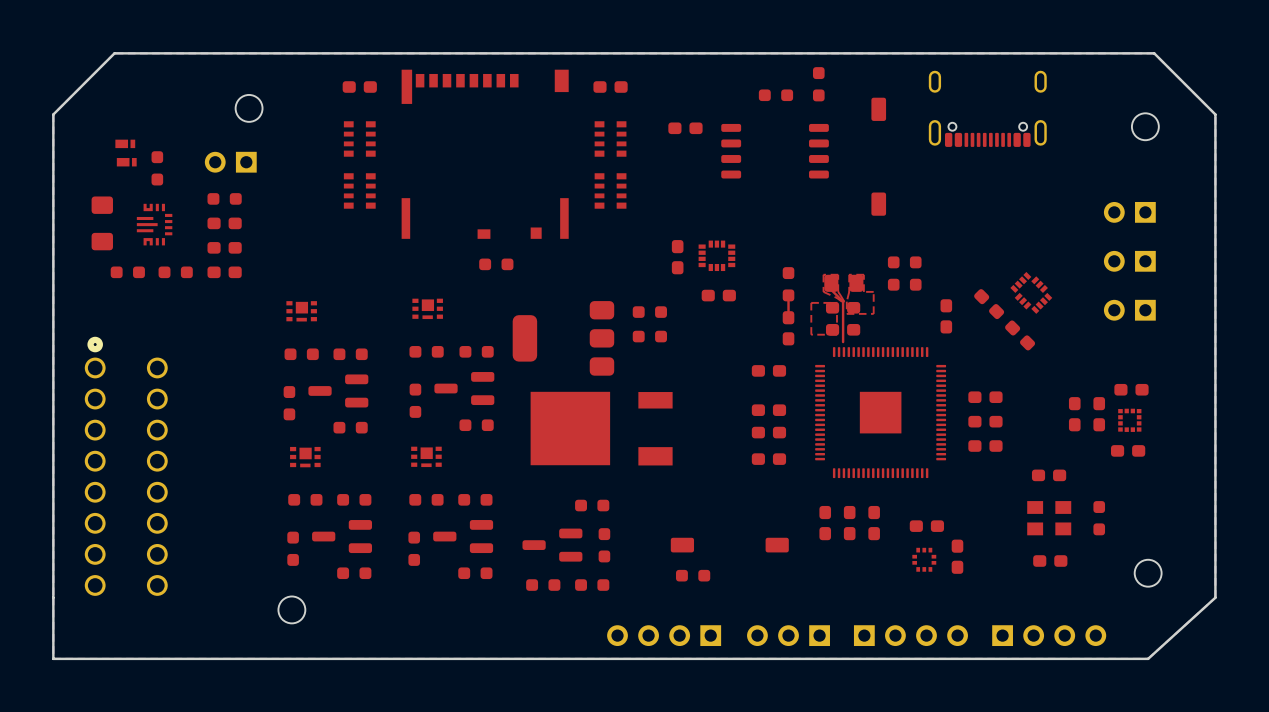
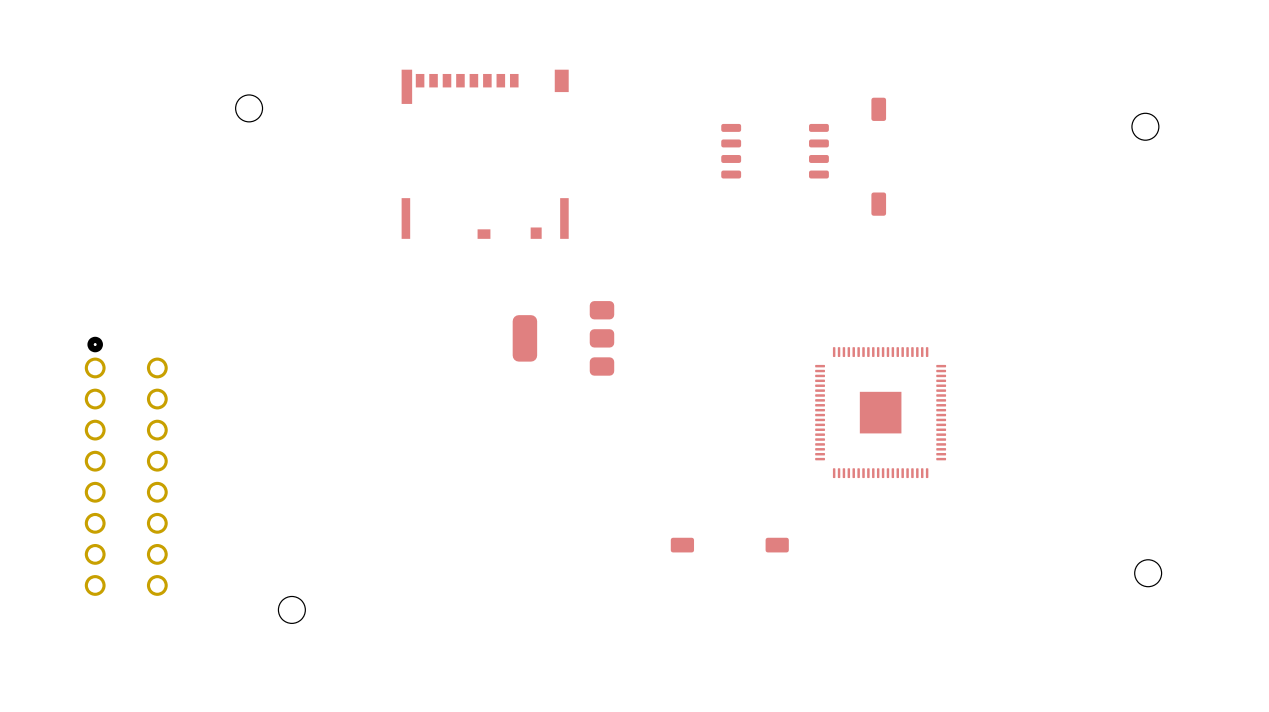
board edge: (1154, 53) (114, 53) (53, 114) (53, 658) (1148, 658) (1215, 597) (1215, 114) (1154, 53) -> none
part: (818, 84) -> none
part: (359, 87) -> none
part: (610, 87) -> none
part: (775, 95) -> none
part: (987, 108) -> none
part: (685, 128) -> none
part: (359, 138) -> none
part: (610, 138) -> none
part: (125, 143) -> none
part: (126, 162) -> none
part: (230, 162) -> none
part: (157, 168) -> none
part: (359, 190) -> none
part: (610, 190) -> none
part: (224, 198) -> none
part: (1129, 212) -> none
part: (102, 223) -> none
part: (224, 223) -> none
part: (154, 224) -> none
part: (224, 247) -> none
part: (716, 255) -> none
part: (677, 257) -> none
part: (1129, 261) -> none
part: (496, 264) -> none
part: (127, 272) -> none
part: (175, 272) -> none
part: (224, 272) -> none
part: (893, 273) -> none
part: (915, 273) -> none
top zone outline: (838, 274) (823, 274) (823, 291) (844, 301) (838, 291) (838, 274) -> none
top zone outline: (863, 274) (849, 274) (846, 313) (873, 313) (873, 291) (863, 291) (863, 274) -> none
top track: (831, 283) (831, 289) (843, 301) (843, 342) -> none
part: (843, 283) -> none
part: (788, 284) -> none
part: (1031, 292) -> none
part: (718, 295) -> none
top track: (788, 295) (788, 317) -> none
top zone outline: (836, 302) (811, 302) (811, 334) (836, 334) (836, 302) -> none
part: (989, 304) -> none
part: (843, 307) -> none
part: (427, 308) -> none
part: (1129, 310) -> none
part: (301, 311) -> none
part: (649, 312) -> none
part: (946, 316) -> none
part: (788, 328) -> none
part: (843, 329) -> none
part: (1020, 335) -> none
part: (649, 336) -> none
part: (426, 351) -> none
part: (476, 351) -> none
part: (301, 354) -> none
part: (350, 354) -> none
part: (768, 370) -> none
part: (464, 388) -> none
part: (1131, 389) -> none
part: (338, 390) -> none
part: (985, 397) -> none
part: (415, 400) -> none
part: (289, 403) -> none
part: (768, 410) -> none
part: (1074, 414) -> none
part: (1099, 414) -> none
part: (1129, 420) -> none
part: (985, 421) -> none
part: (476, 425) -> none
part: (350, 427) -> none
part: (601, 428) -> none
part: (768, 432) -> none
part: (985, 446) -> none
part: (1128, 450) -> none
part: (426, 456) -> none
part: (305, 457) -> none
part: (768, 459) -> none
part: (1049, 475) -> none
part: (305, 499) -> none
part: (354, 499) -> none
part: (426, 499) -> none
part: (475, 499) -> none
part: (592, 505) -> none
part: (1049, 518) -> none
part: (1099, 518) -> none
part: (825, 523) -> none
part: (849, 523) -> none
part: (874, 523) -> none
part: (926, 526) -> none
part: (342, 536) -> none
part: (463, 536) -> none
part: (552, 545) -> none
part: (604, 545) -> none
part: (293, 548) -> none
part: (414, 548) -> none
part: (957, 556) -> none
part: (924, 559) -> none
part: (1050, 561) -> none
part: (354, 573) -> none
part: (475, 573) -> none
part: (693, 575) -> none
part: (543, 585) -> none
part: (592, 585) -> none
part: (664, 635) -> none
part: (788, 635) -> none
part: (910, 635) -> none
part: (1049, 635) -> none

